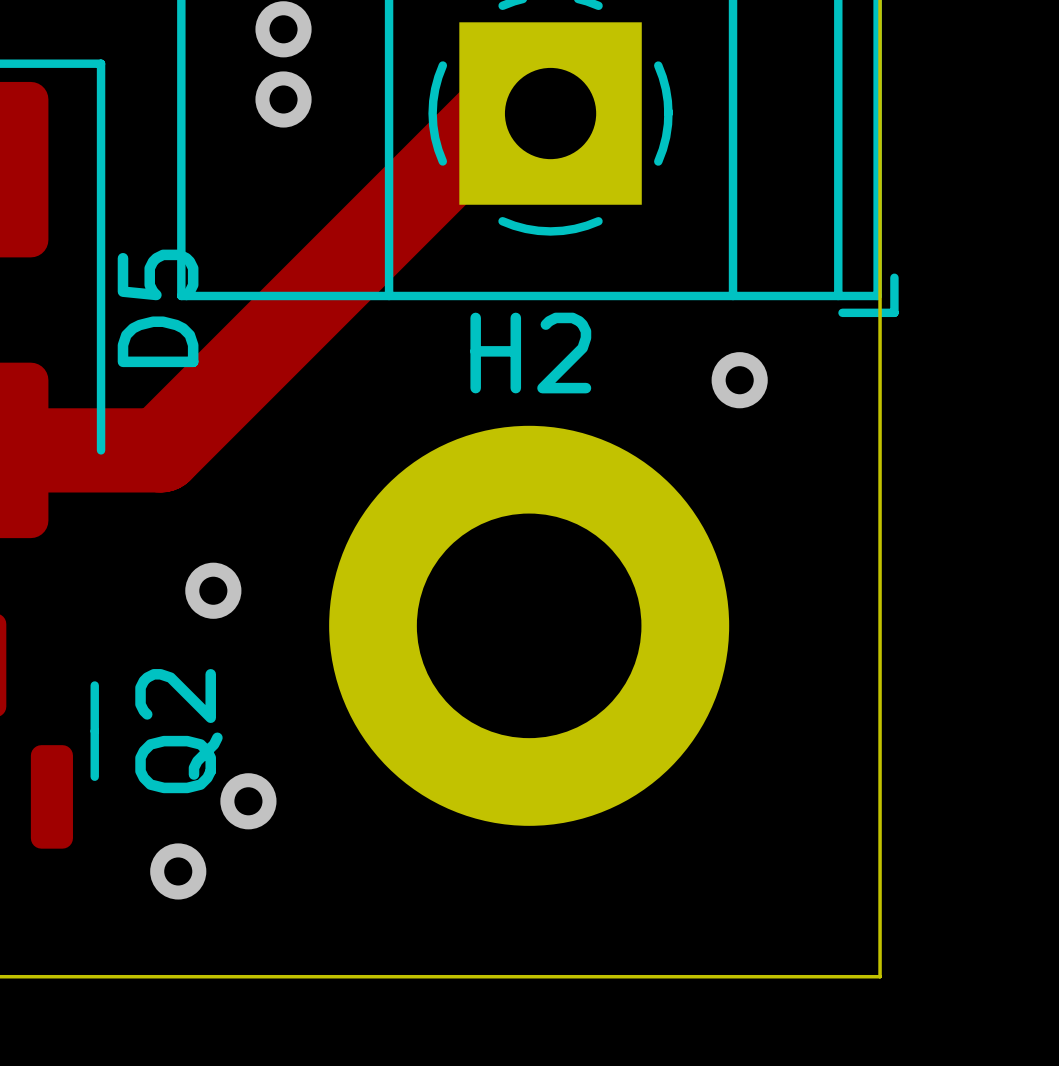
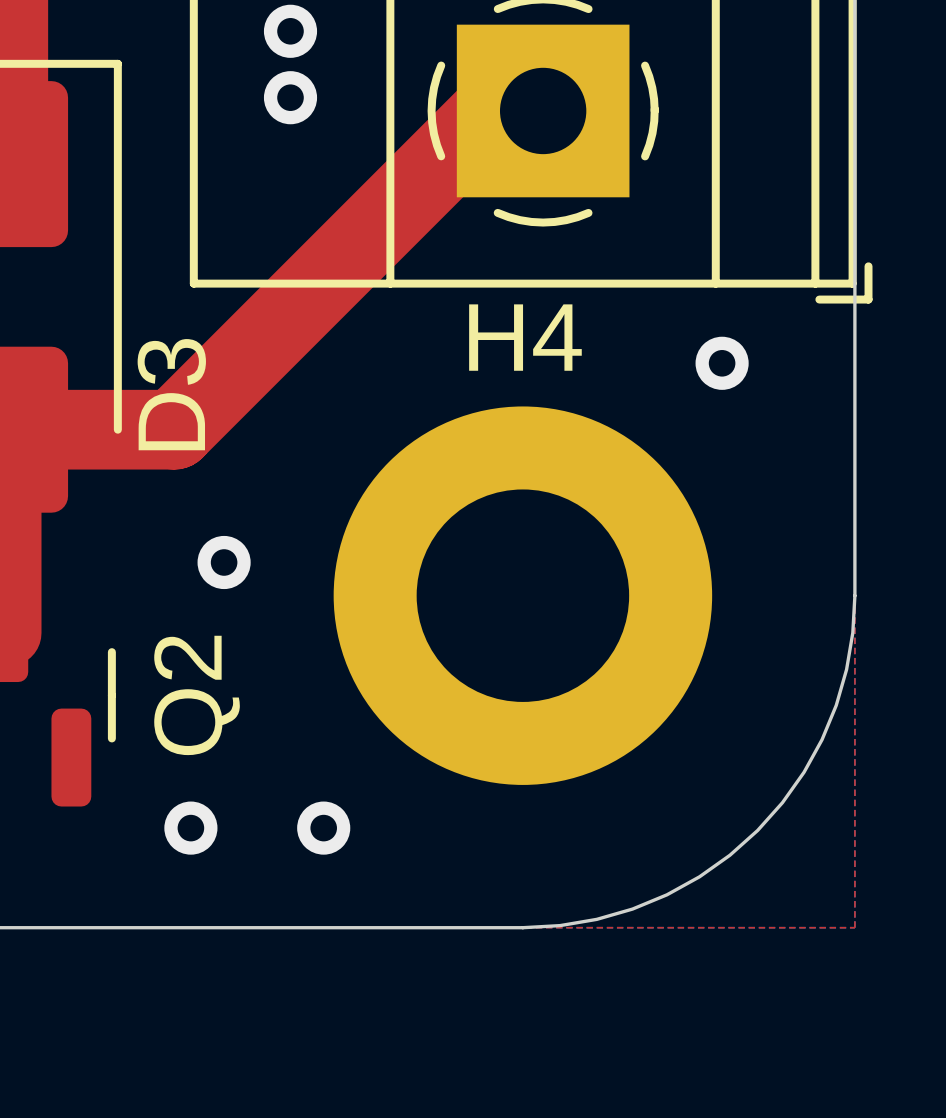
D5 name: D5 (158, 308) -> D3 (171, 394)
H2 name: H2 (530, 353) -> H4 (525, 337)
board edge: (880, 625) (880, 976) (529, 976) -> (854, 595) (852, 632) (846, 669) (836, 705) (822, 739) (804, 772) (782, 802) (757, 830) (729, 855) (699, 876) (666, 894) (632, 909) (596, 919) (560, 925) (522, 927)
via position: (248, 801) -> (323, 828)

